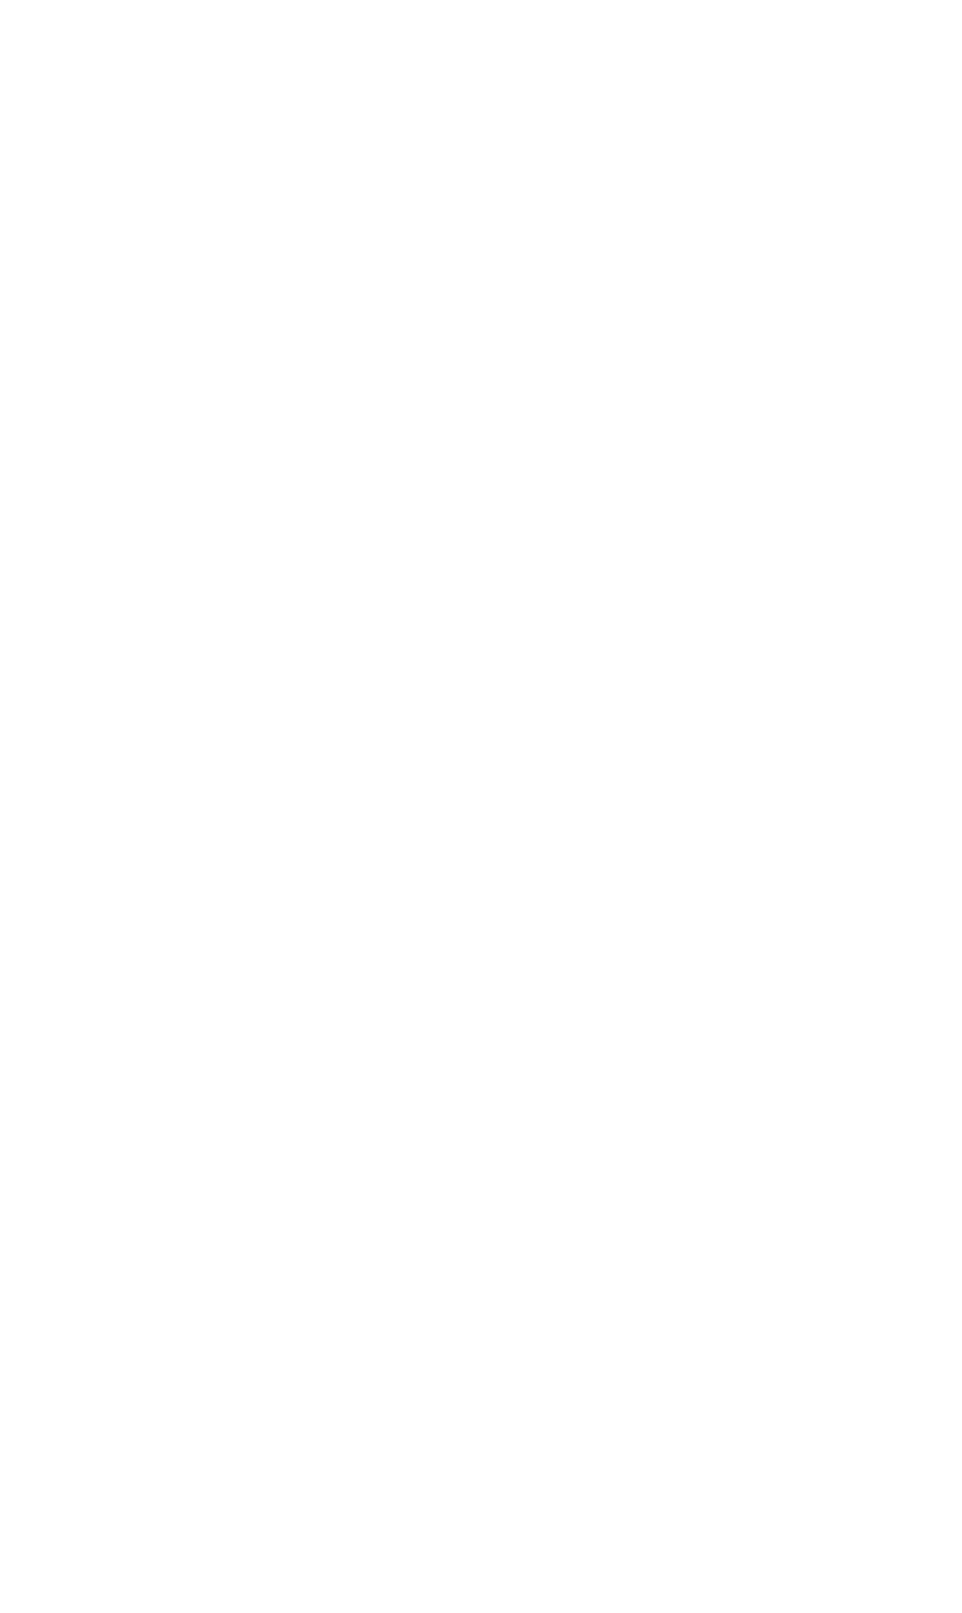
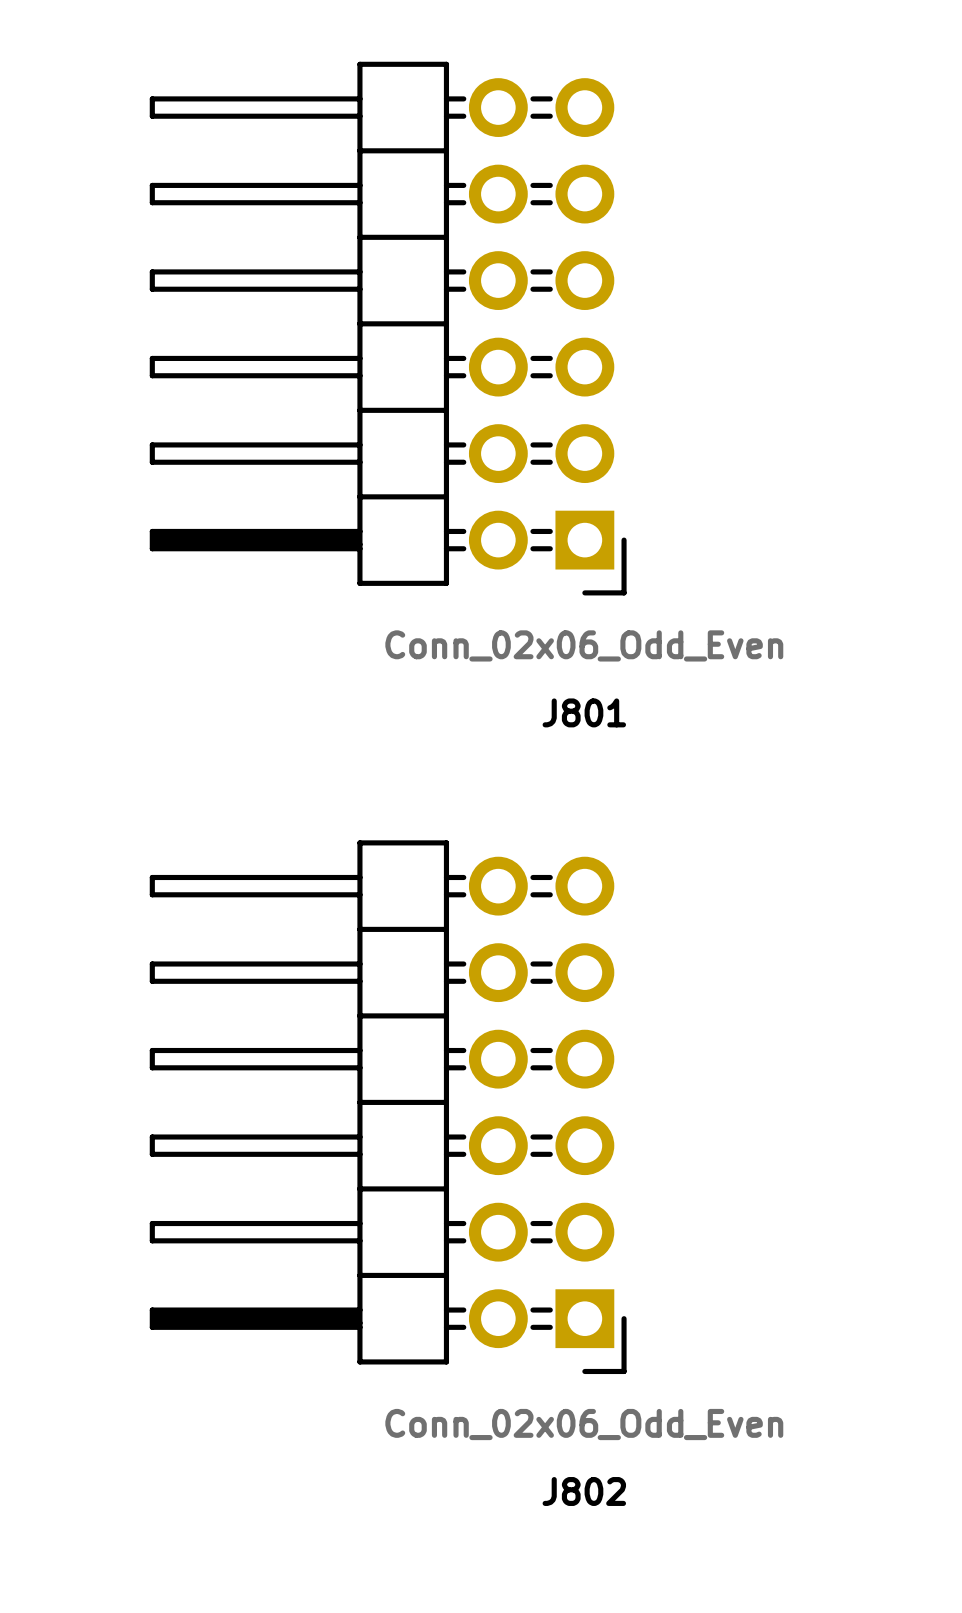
J801: none -> Conn_02x06_Odd_Even (388, 328)
J802: none -> Conn_02x06_Odd_Even (388, 1107)

